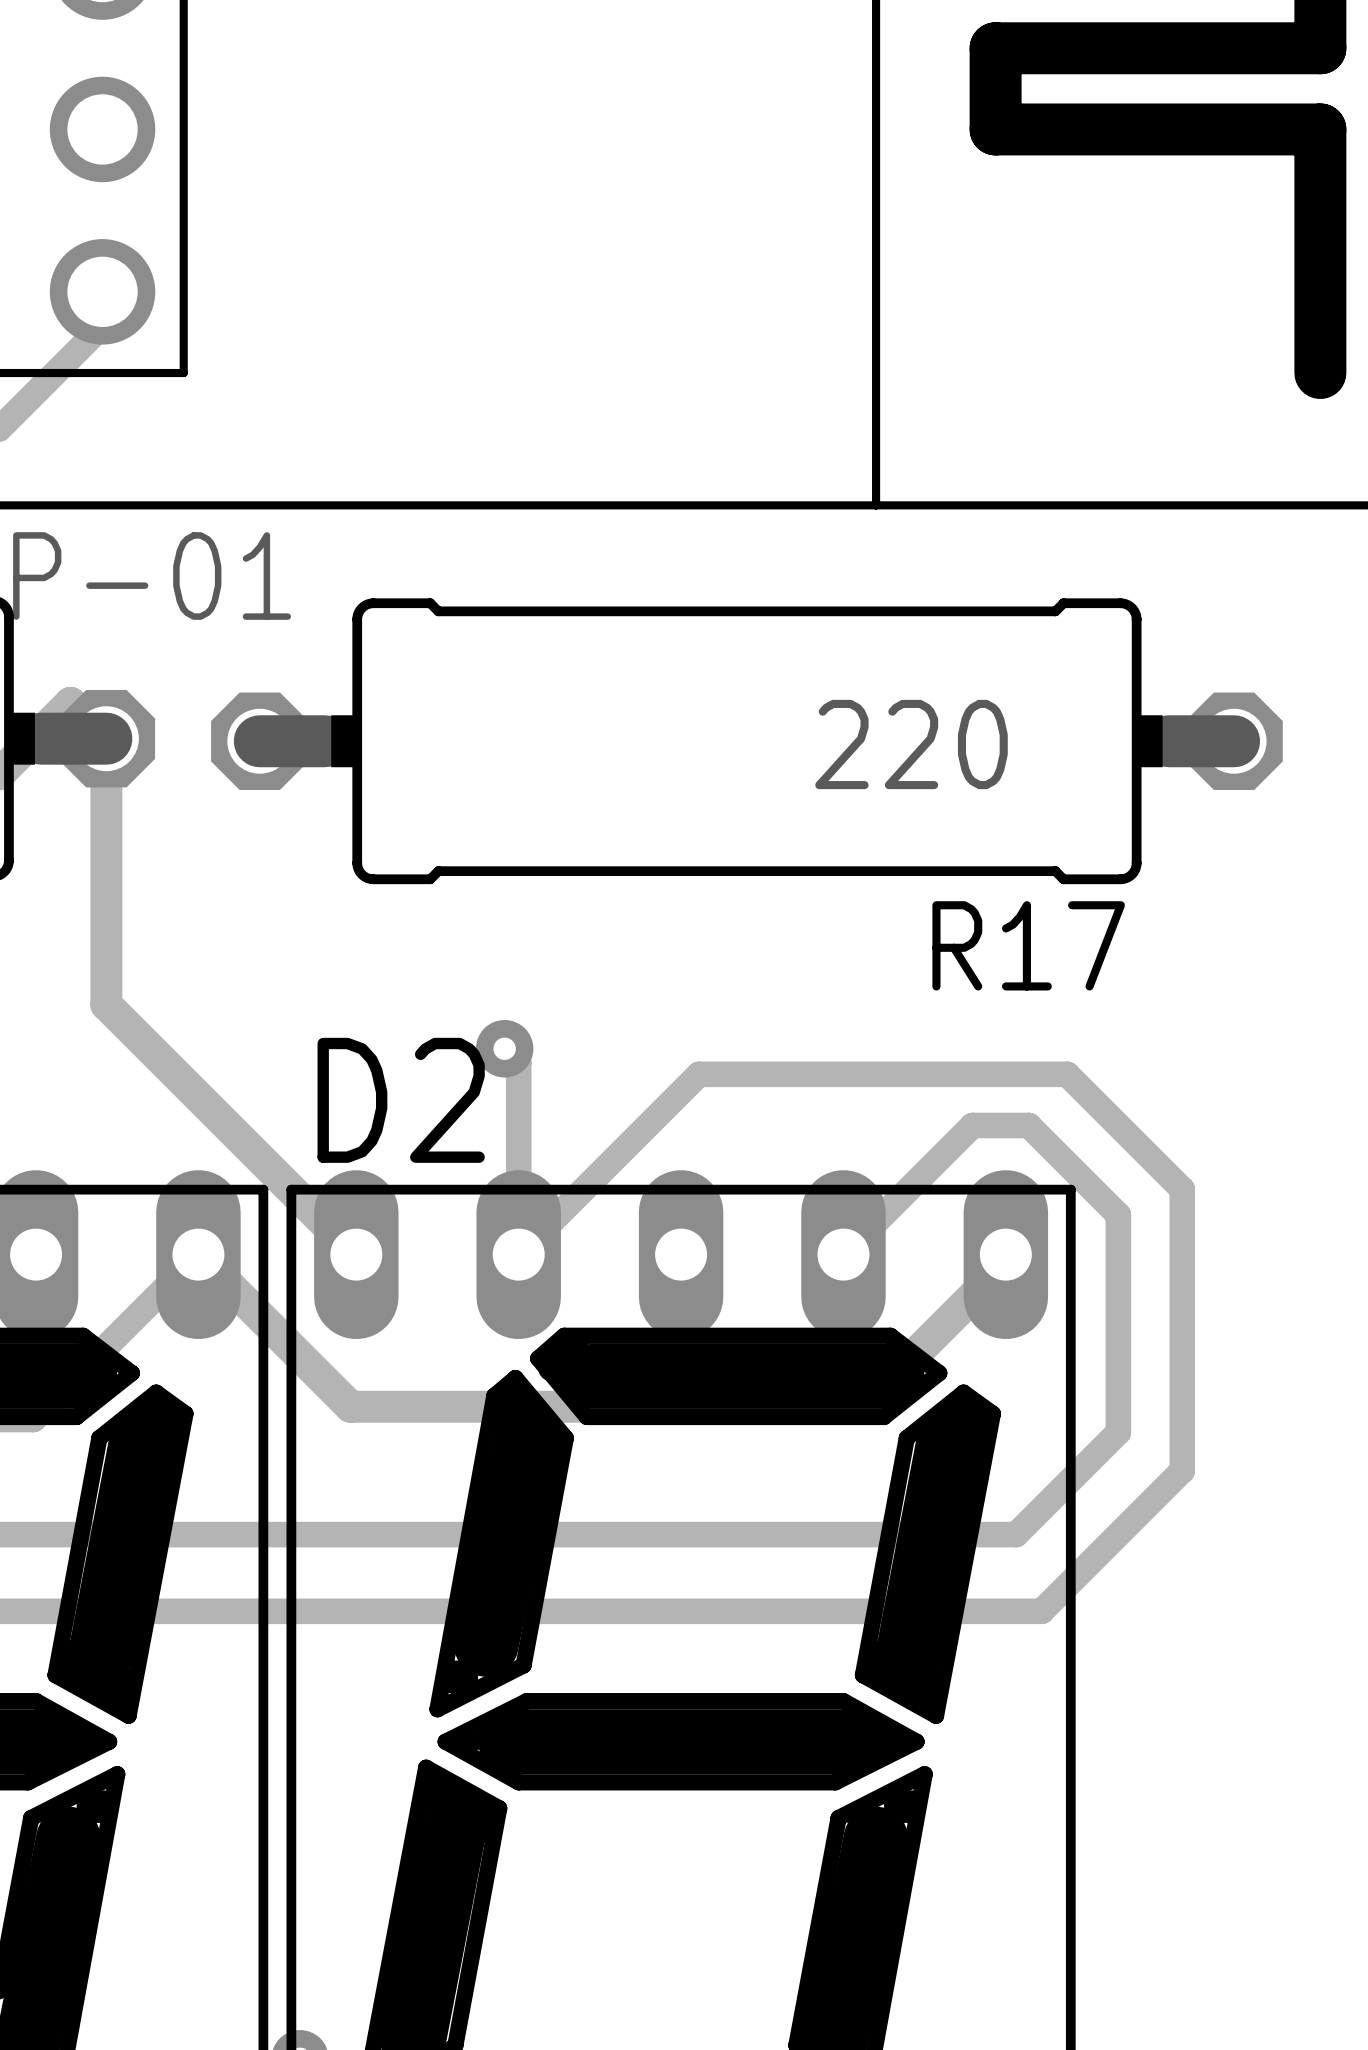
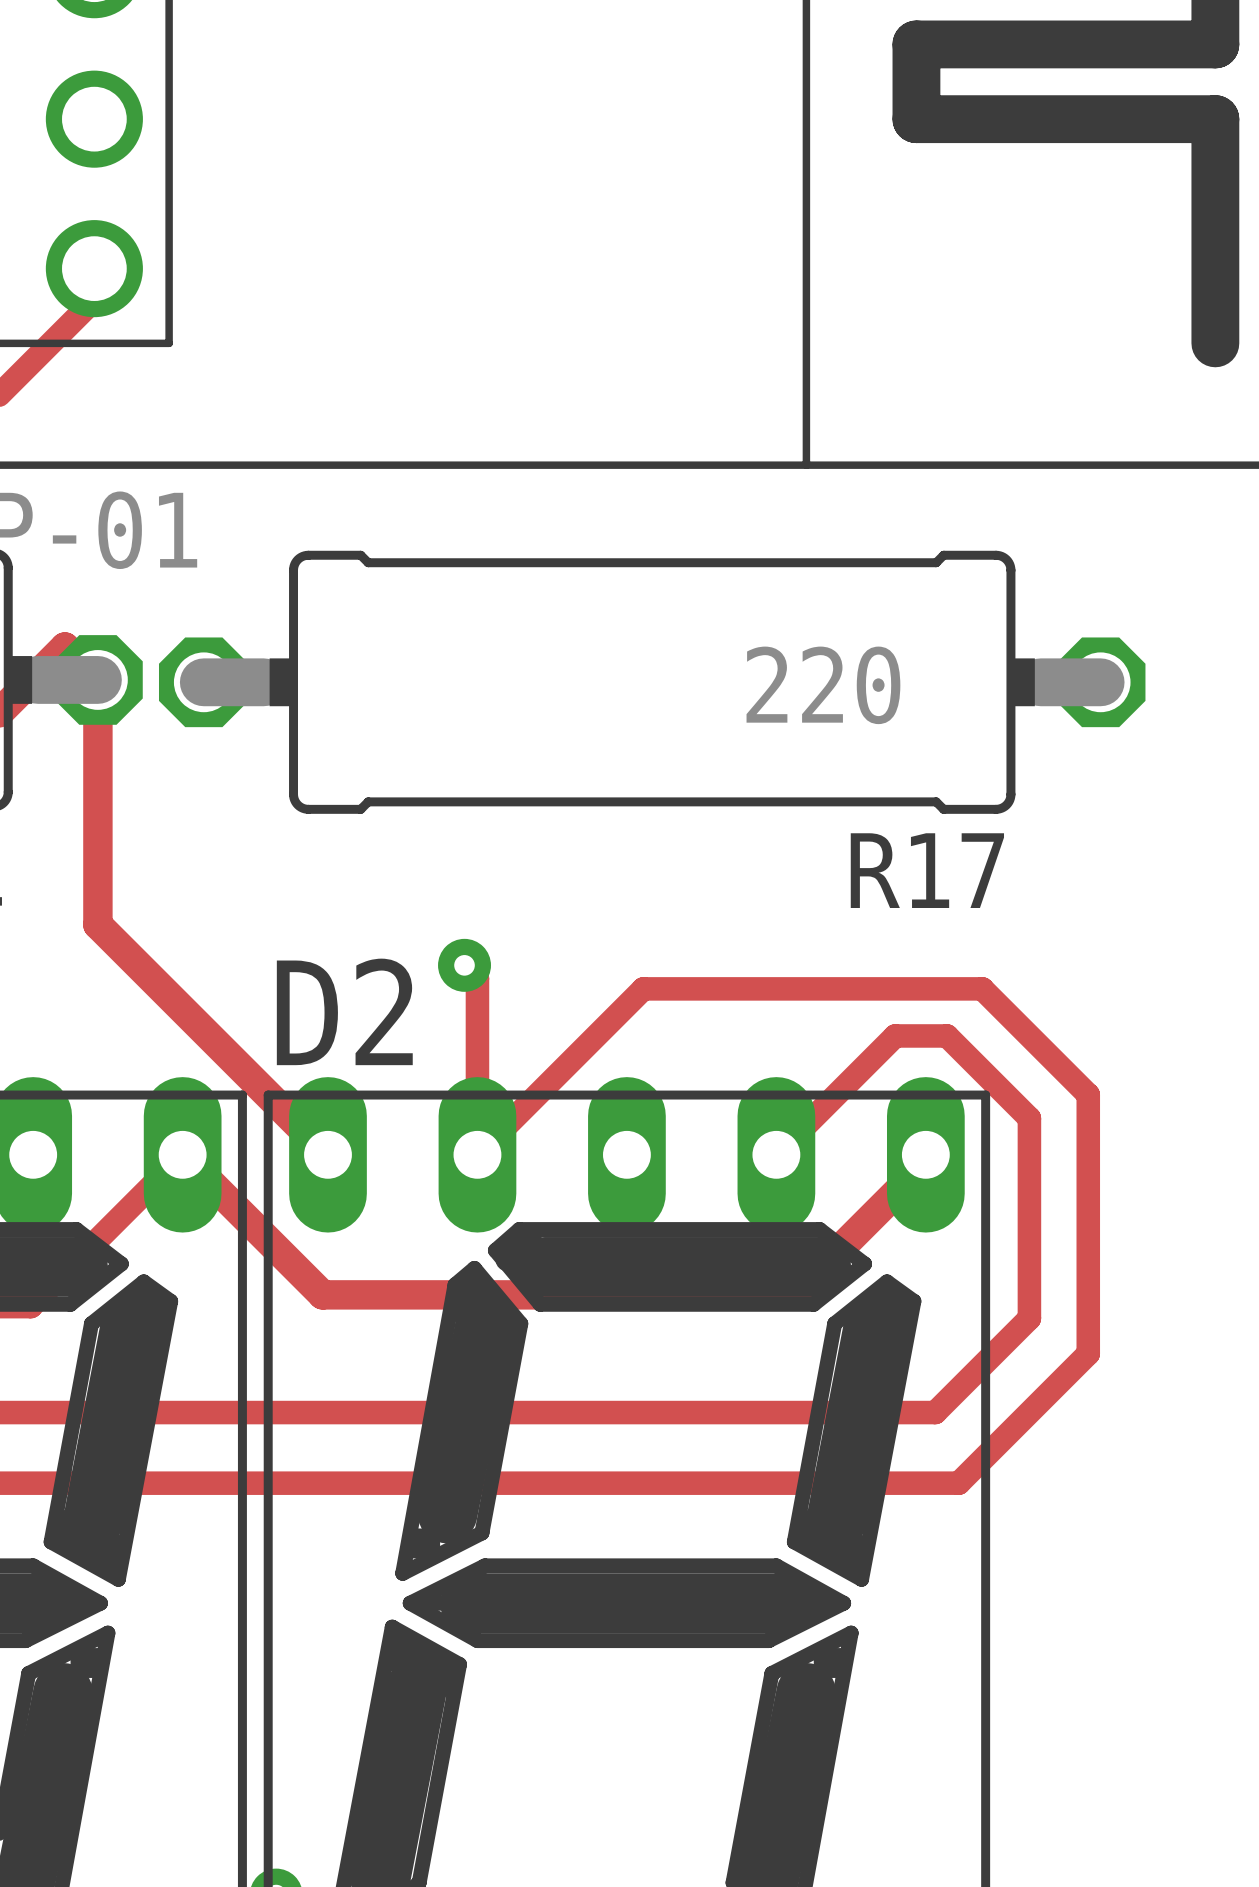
R17 position: (746, 741) -> (652, 682)

